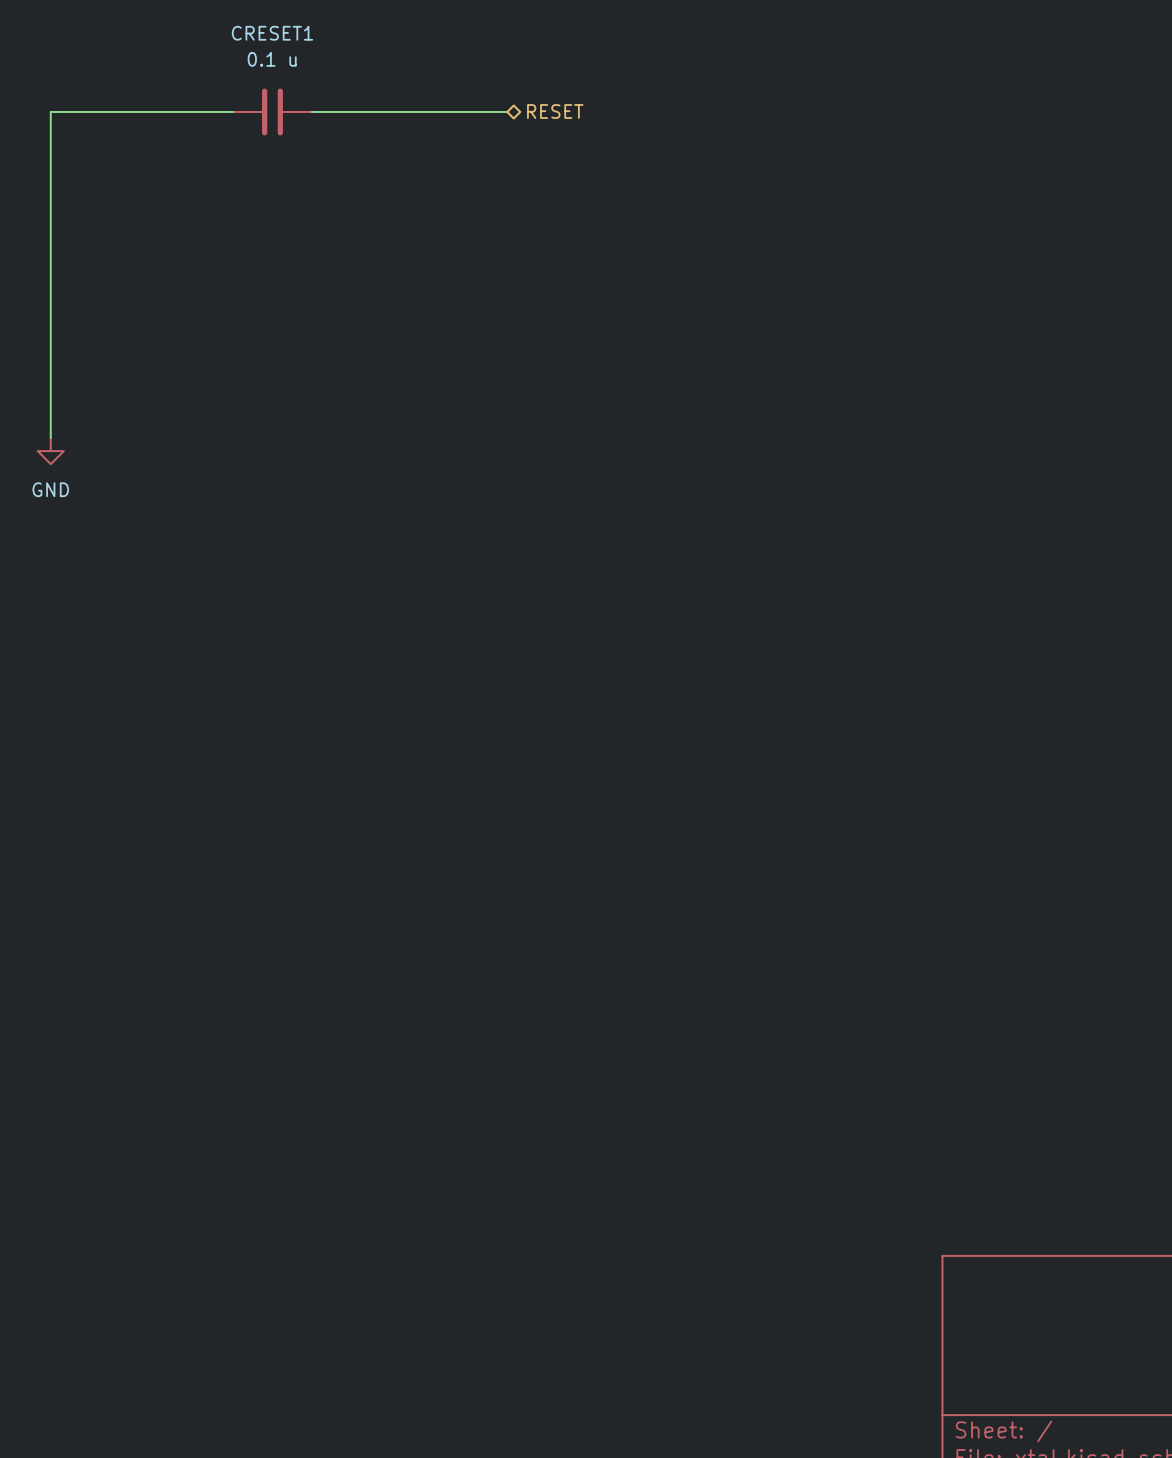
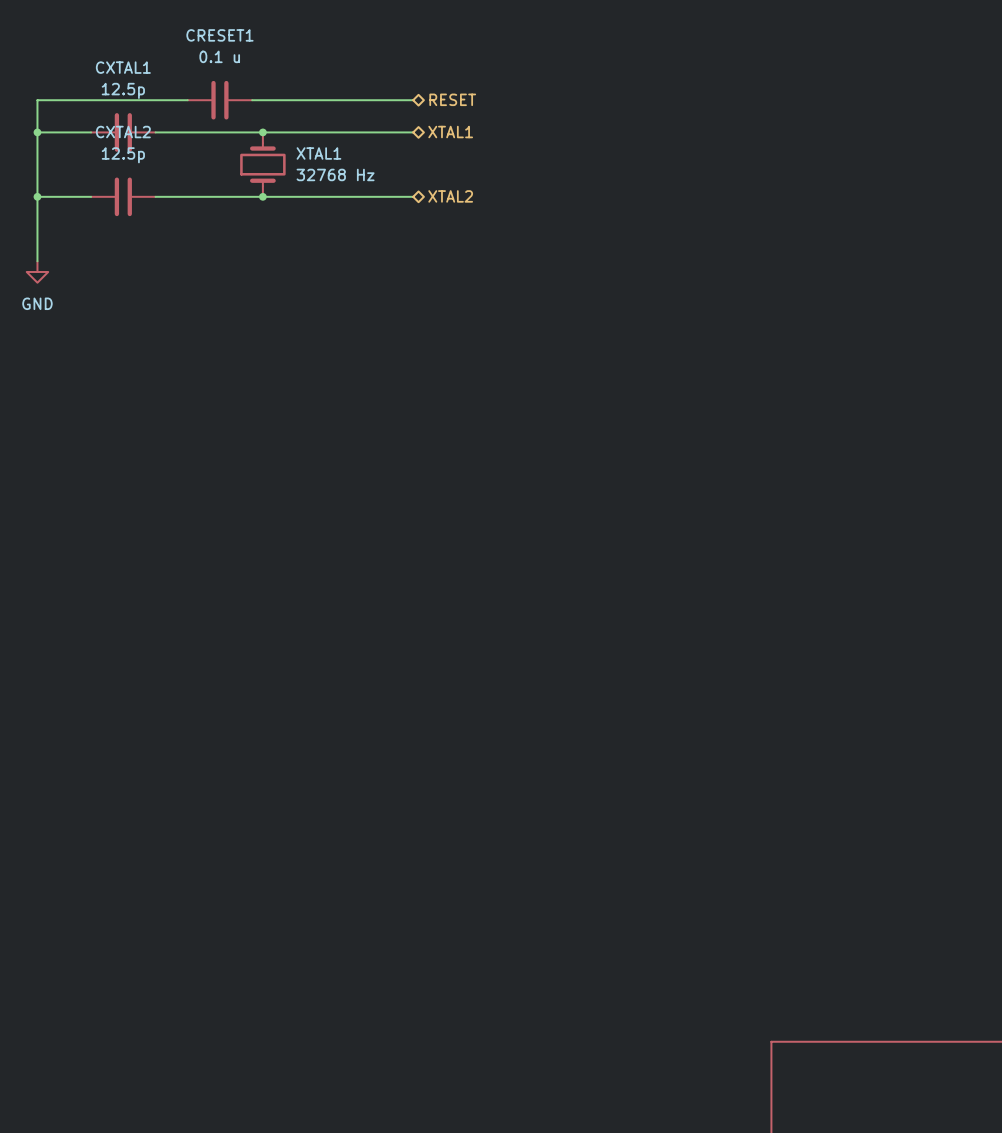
hierarchical label: none -> XTAL1 (450, 132)
wire: none -> (37, 132) (91, 132)
junction: none -> (37, 132)
CXTAL1: none -> 12.5p (123, 132)
wire: none -> (155, 132) (413, 132)
junction: none -> (262, 132)
XTAL1: none -> 32768 Hz (262, 164)
hierarchical label: none -> XTAL2 (450, 196)
wire: none -> (37, 196) (91, 196)
junction: none -> (37, 196)
CXTAL2: none -> 12.5p (123, 196)
wire: none -> (155, 196) (413, 196)
junction: none -> (262, 196)
wire: (50, 307) (50, 438) -> none
power symbol position: GND (50, 451) -> GND (37, 271)

